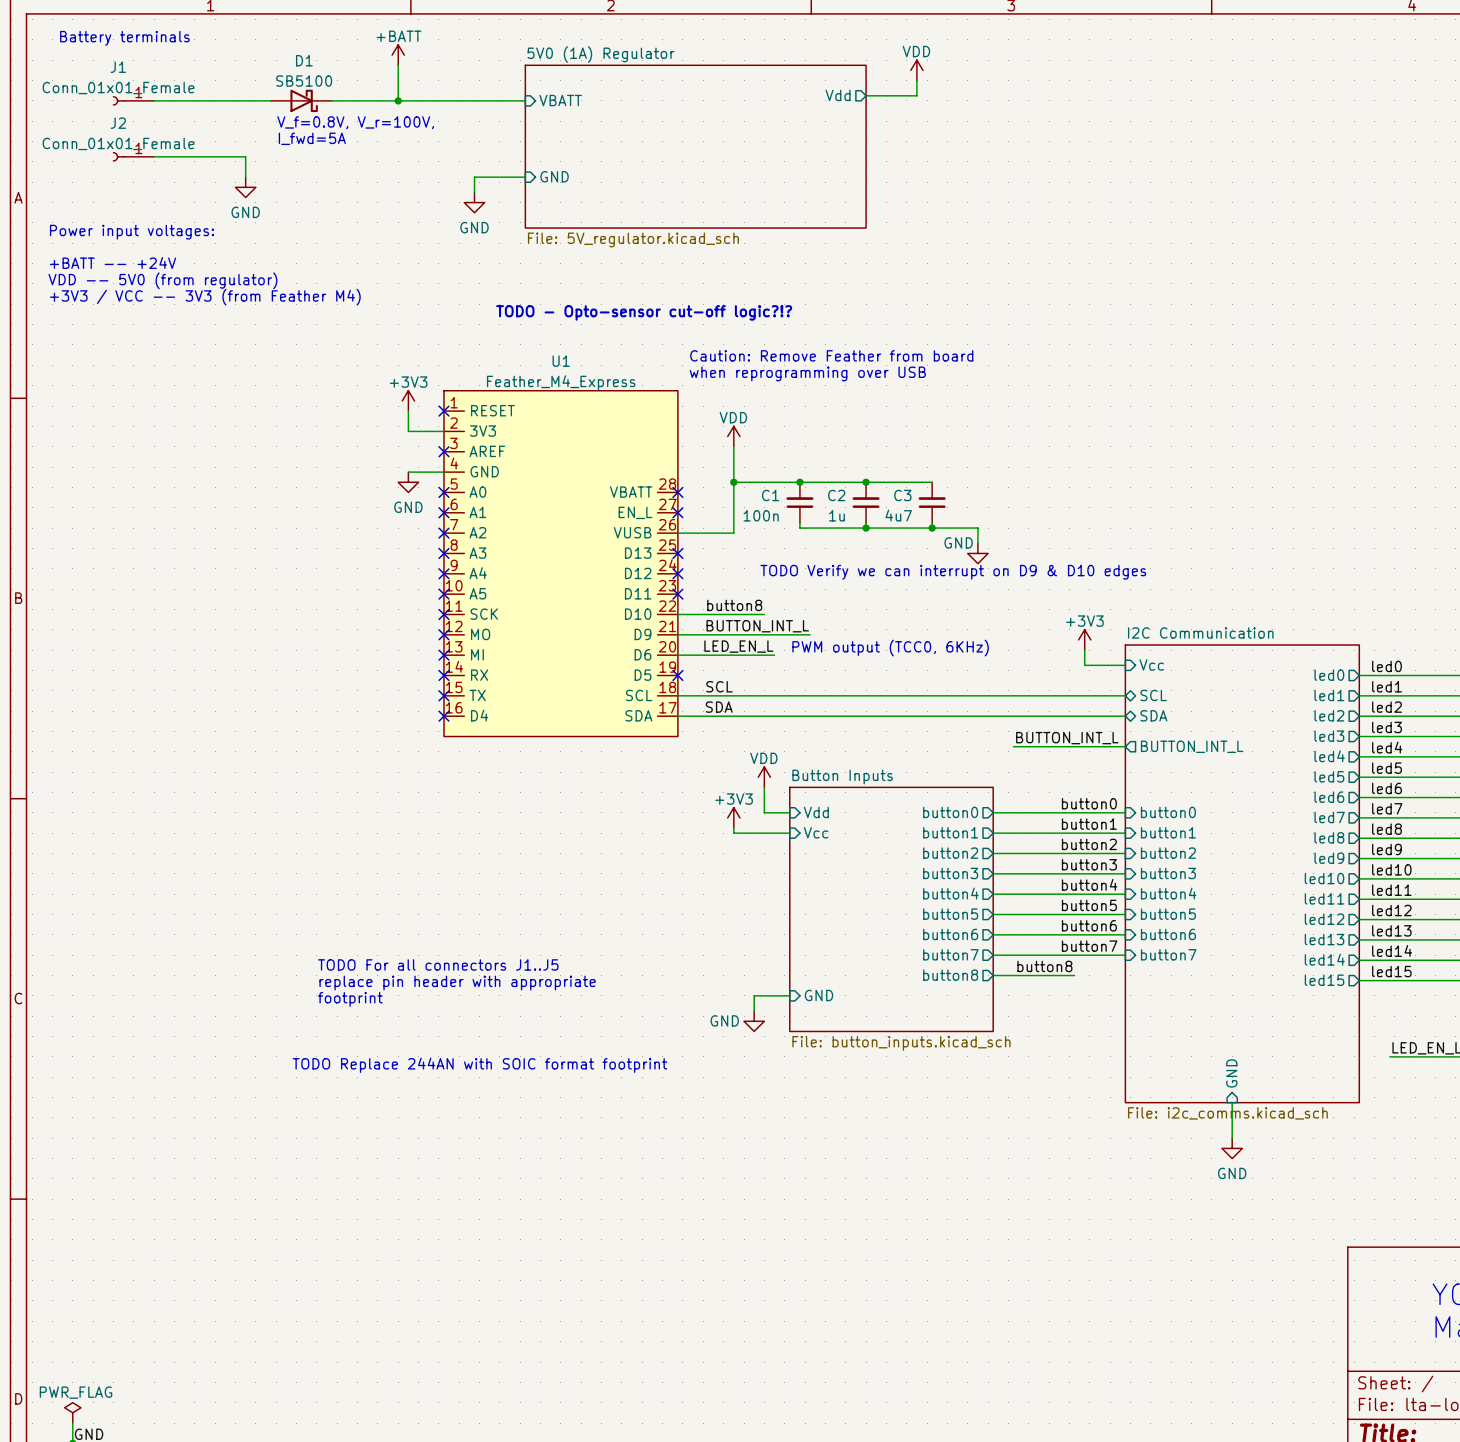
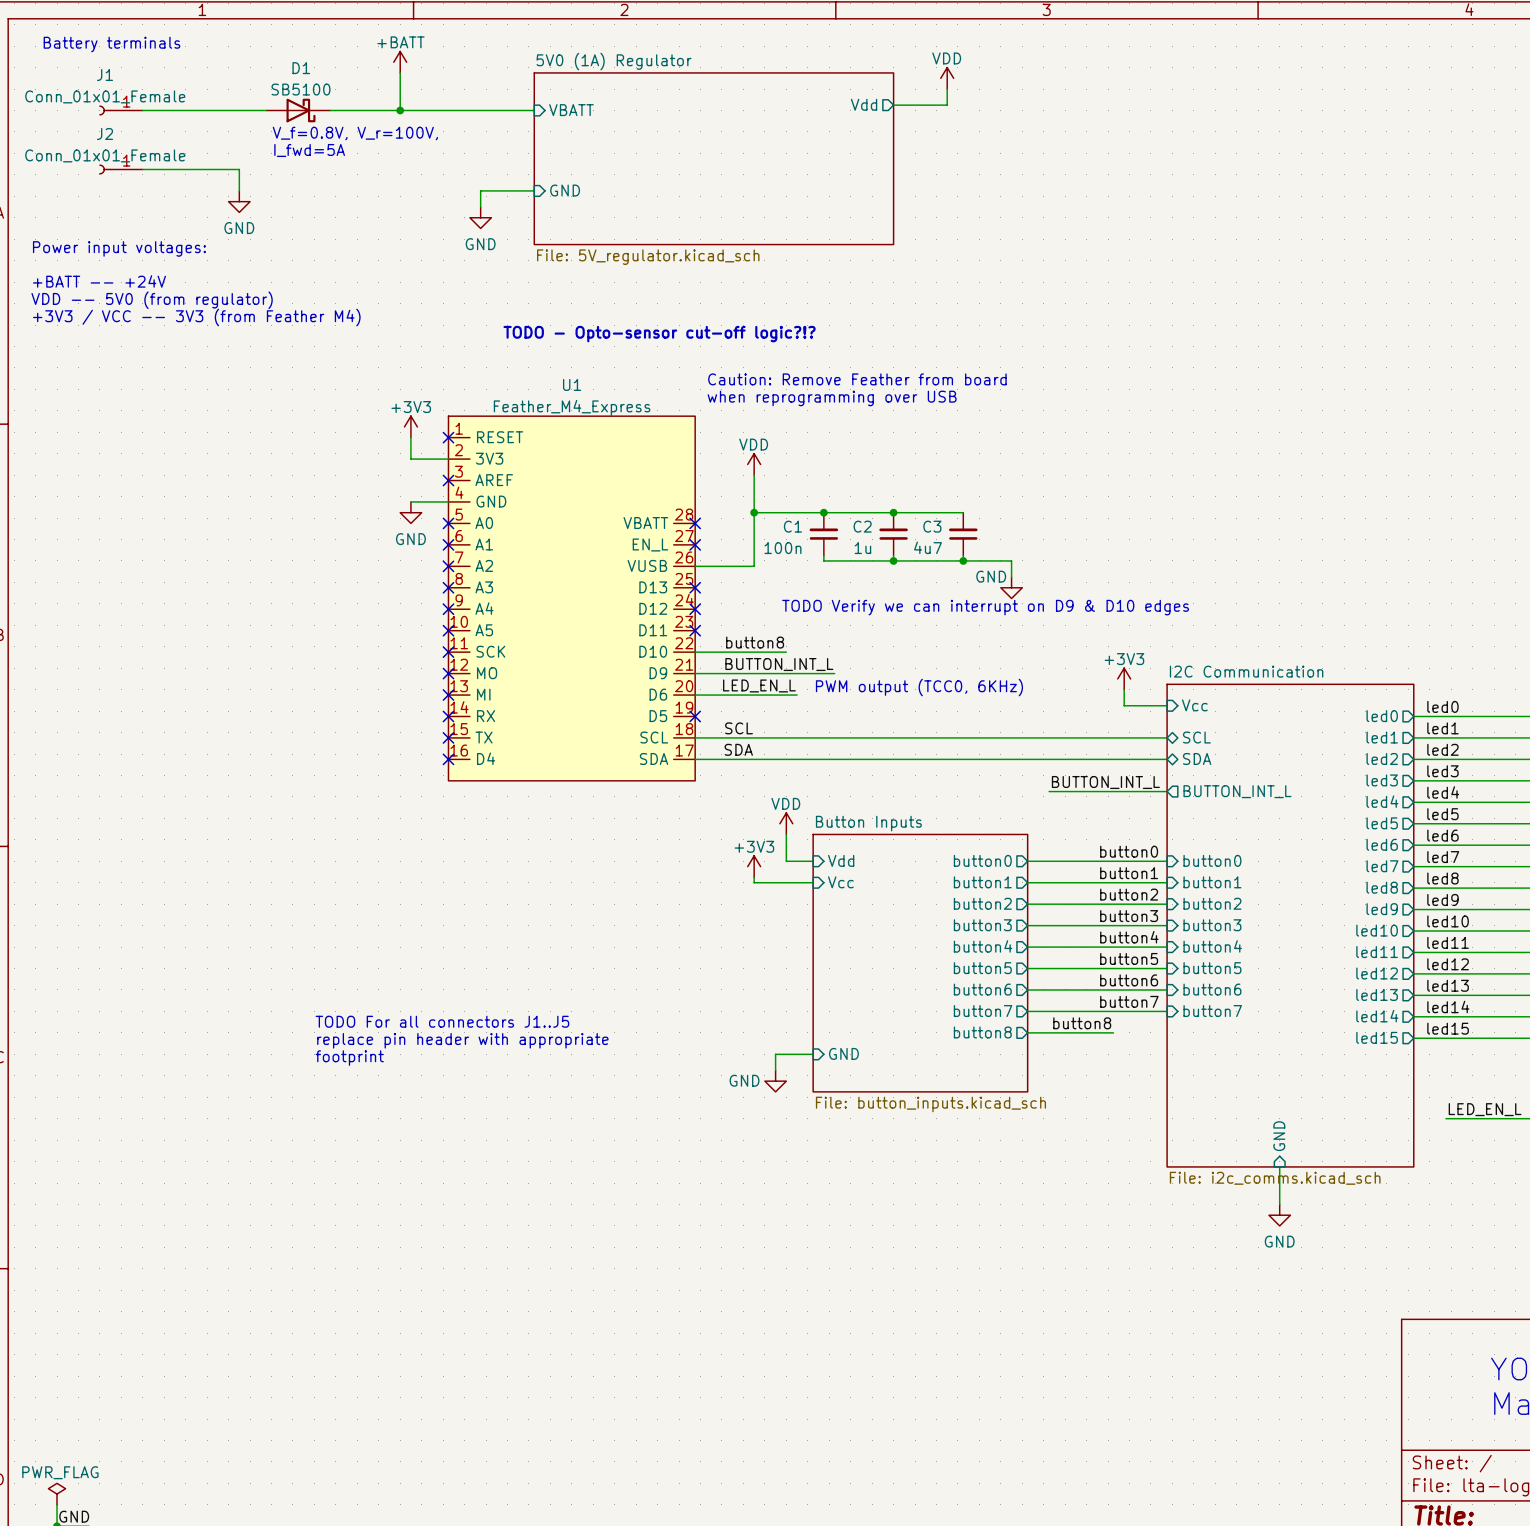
text: TODO Replace 244AN with SOIC format footprint (479, 1065) -> none

